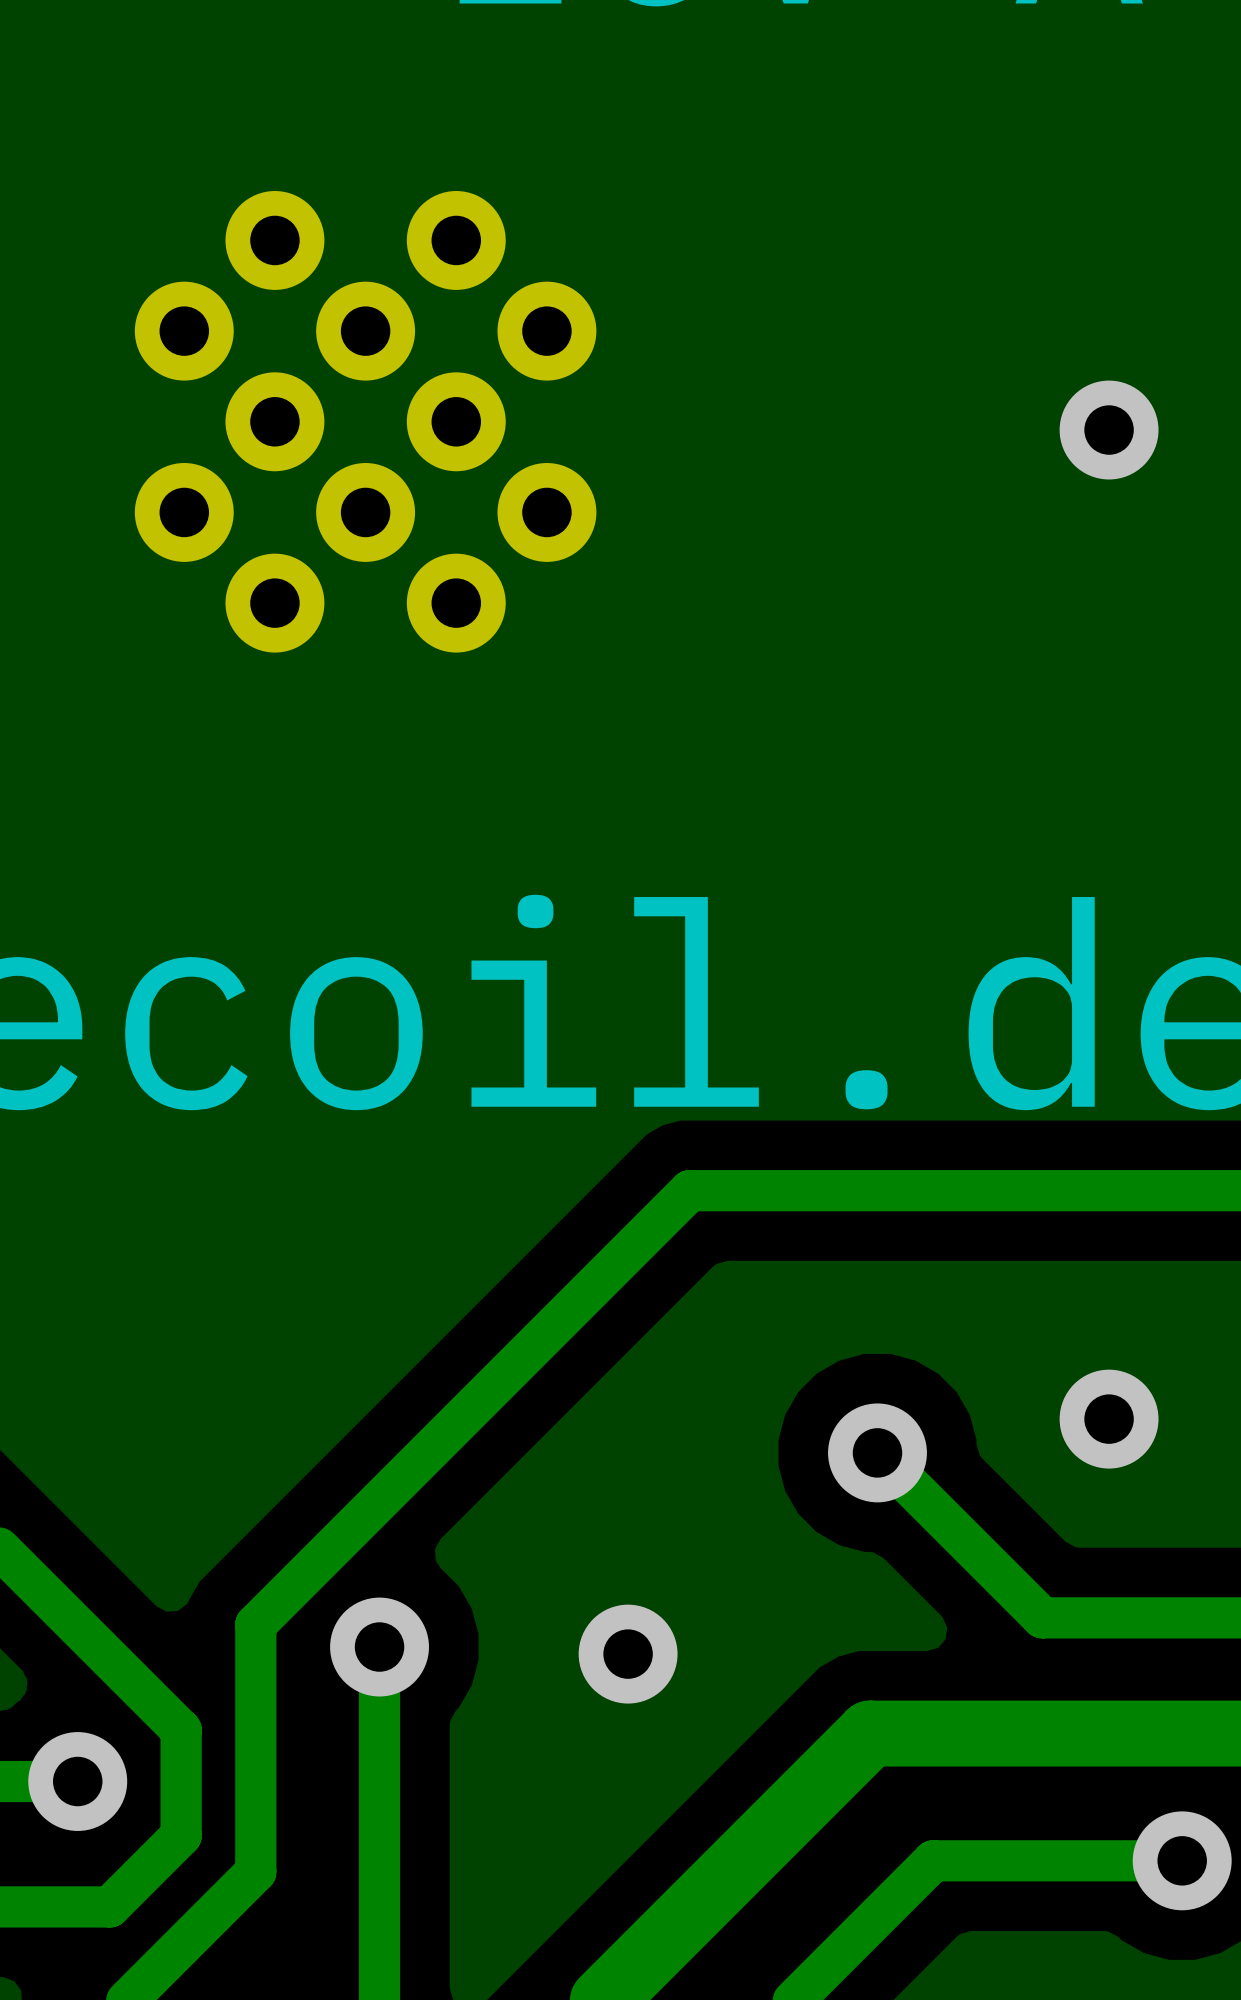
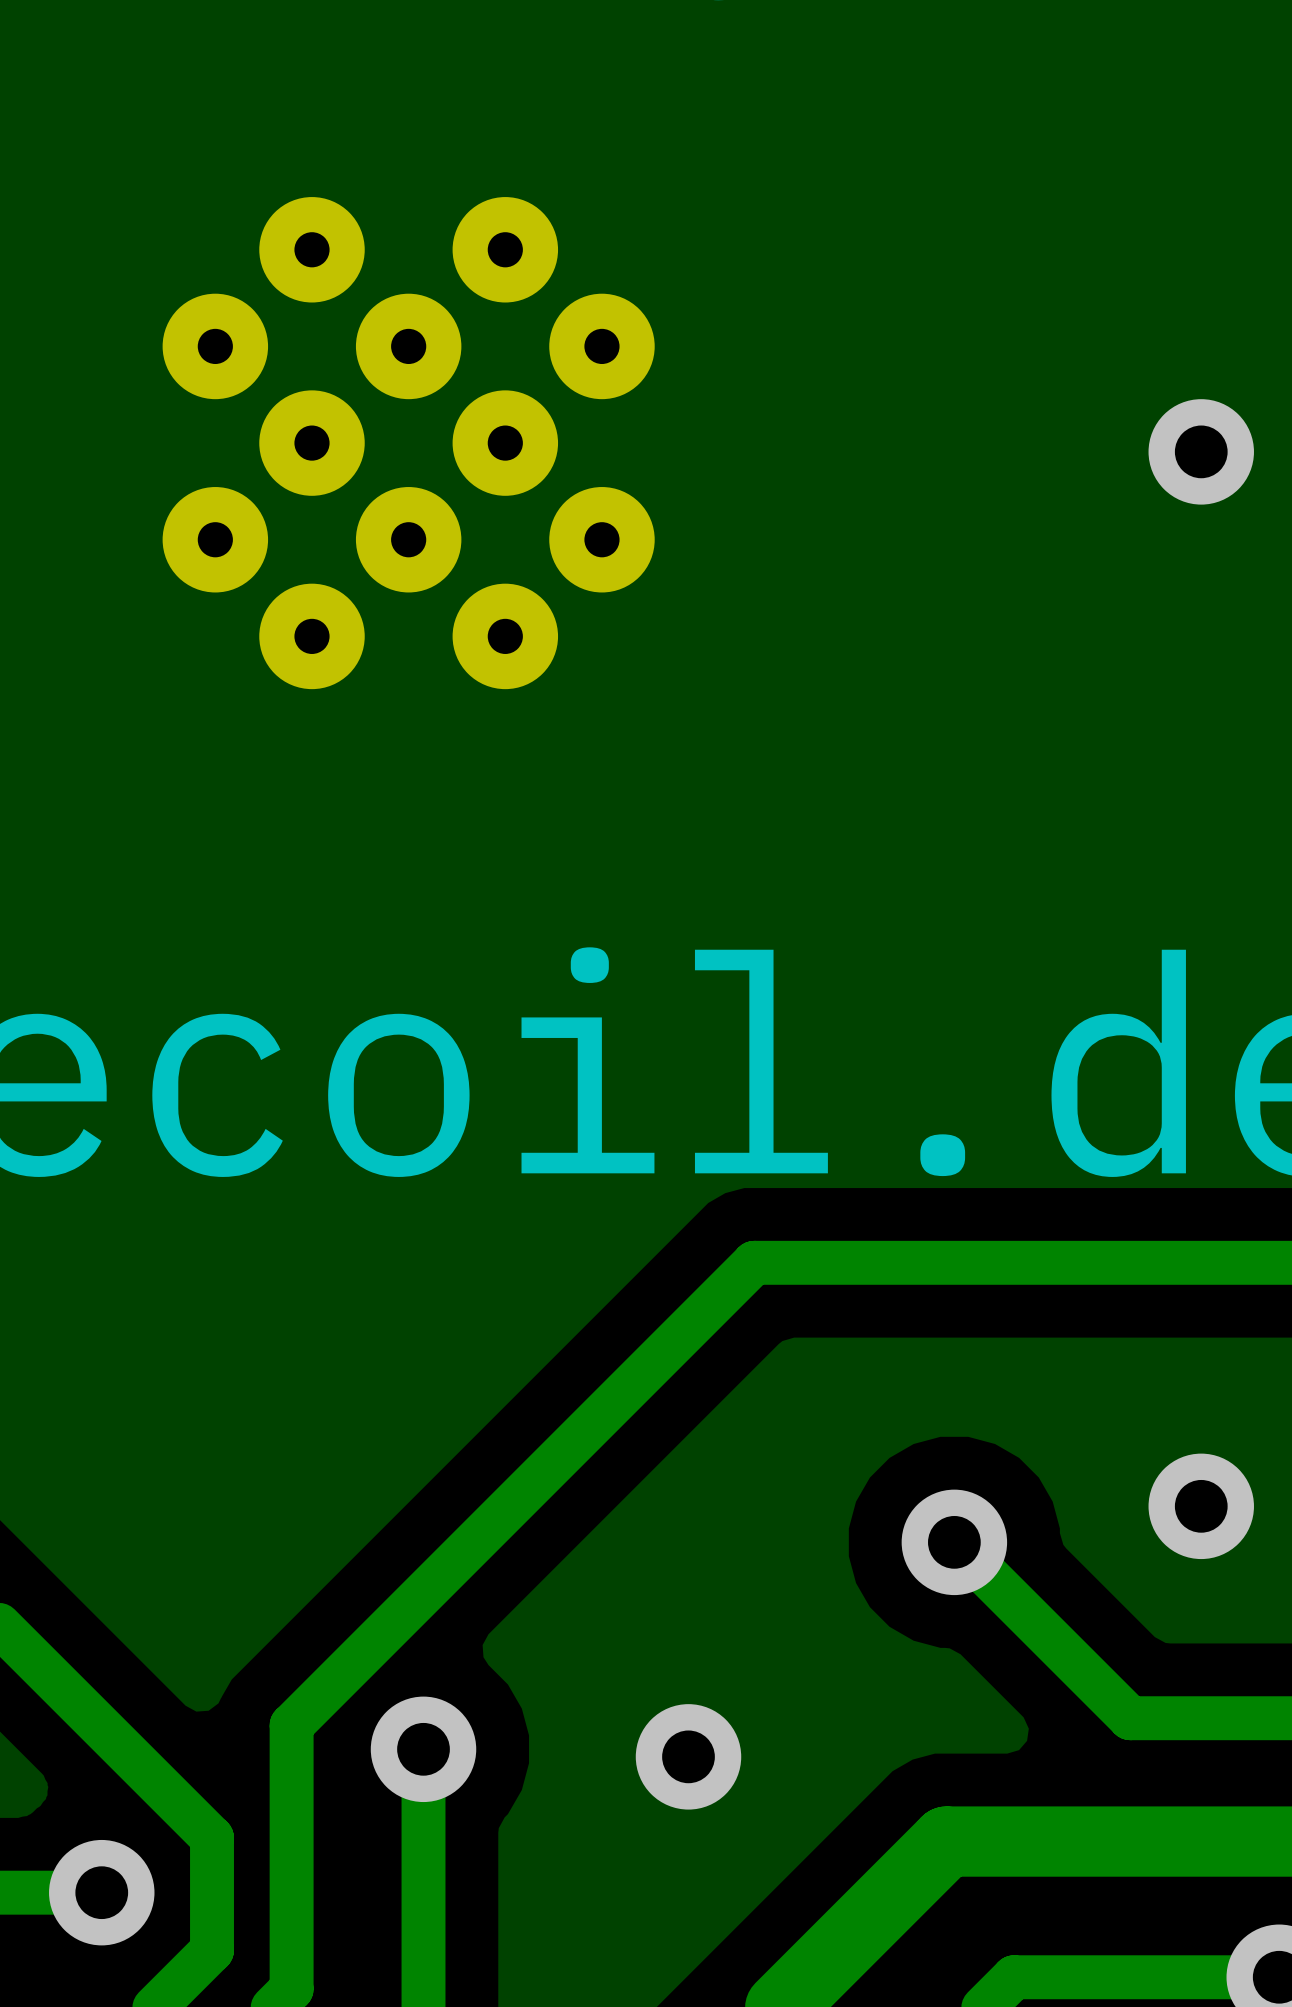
part footprint: [134, 191, 597, 653] -> [162, 197, 655, 690]

